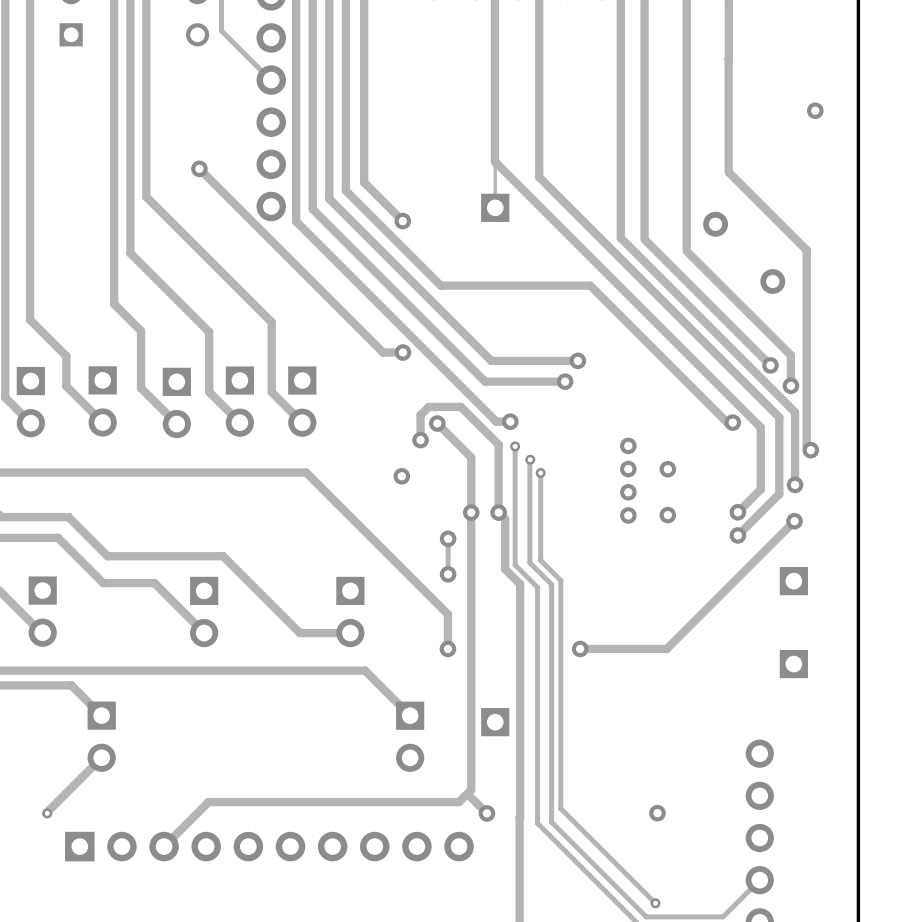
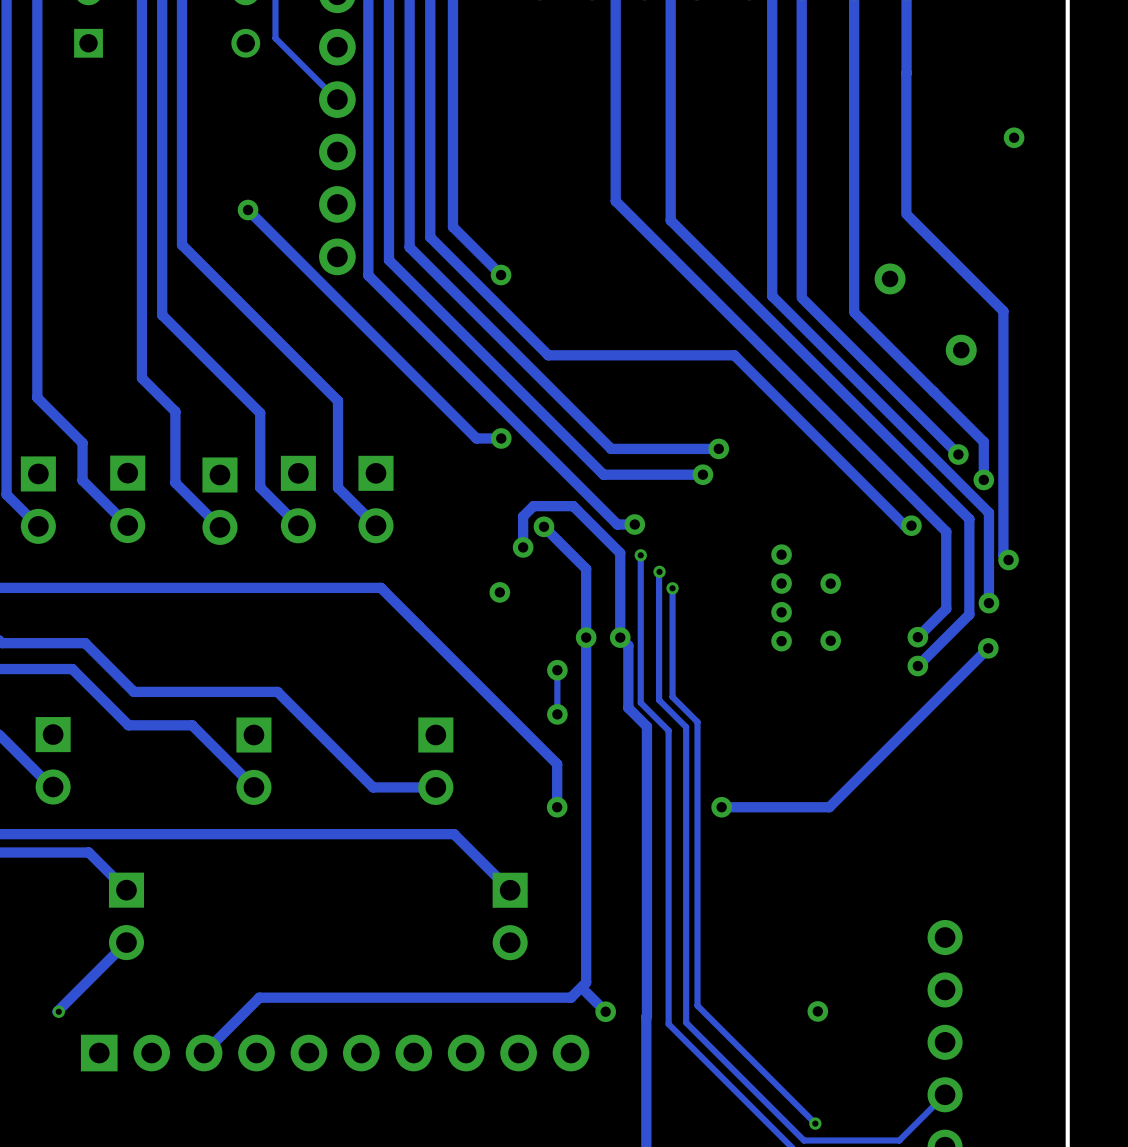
track: (497, 164) (495, 166) (495, 207) -> none
part: (495, 207) -> none
part: (793, 581) -> none
part: (793, 664) -> none
part: (495, 722) -> none

